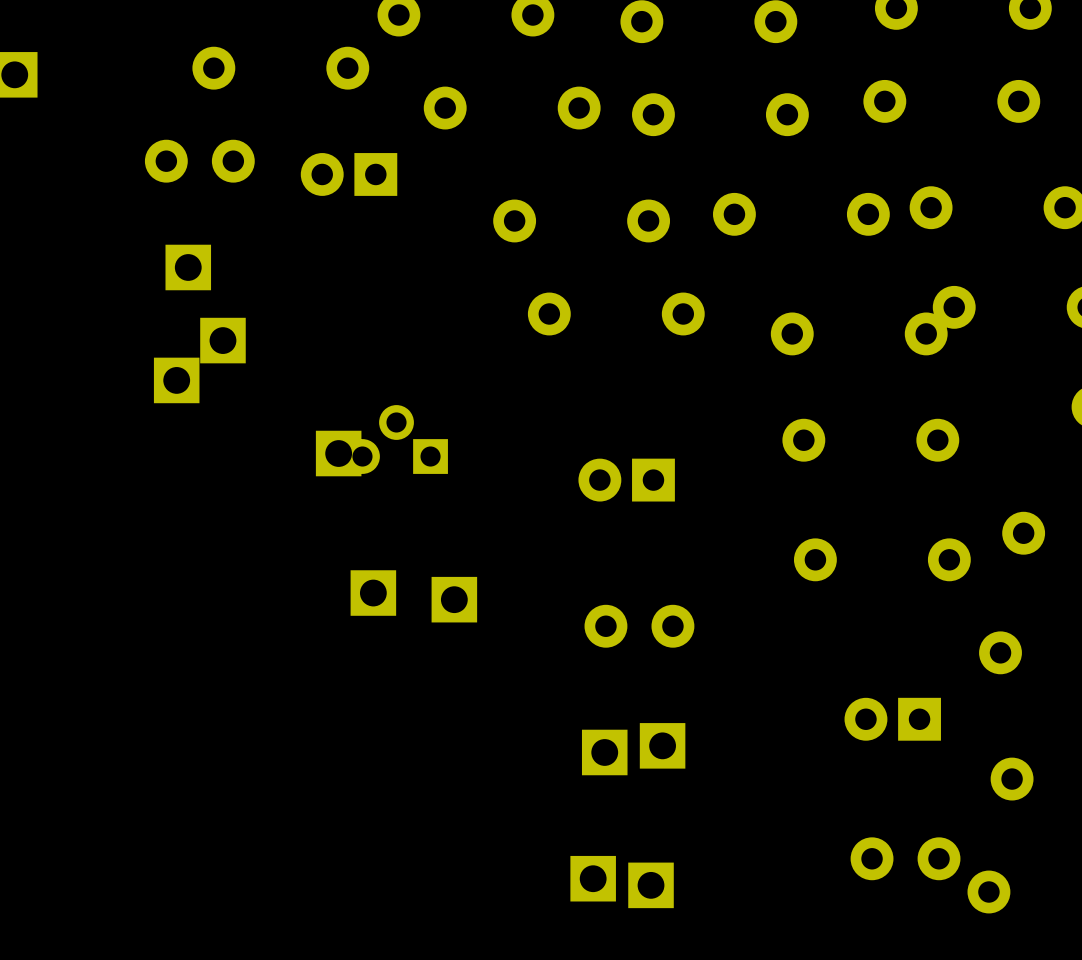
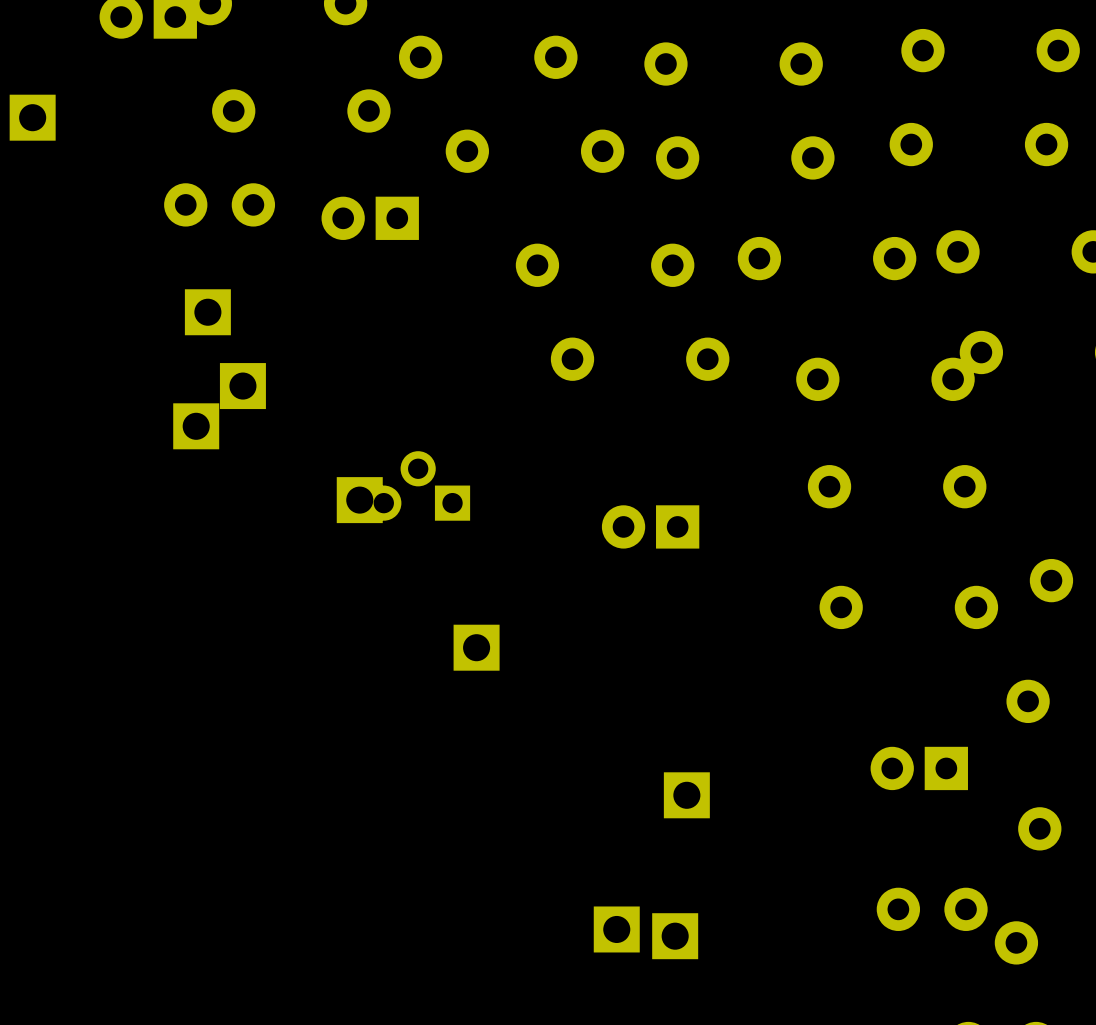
part: (373, 593) -> none
part: (639, 626) -> none
part: (604, 752) -> none

